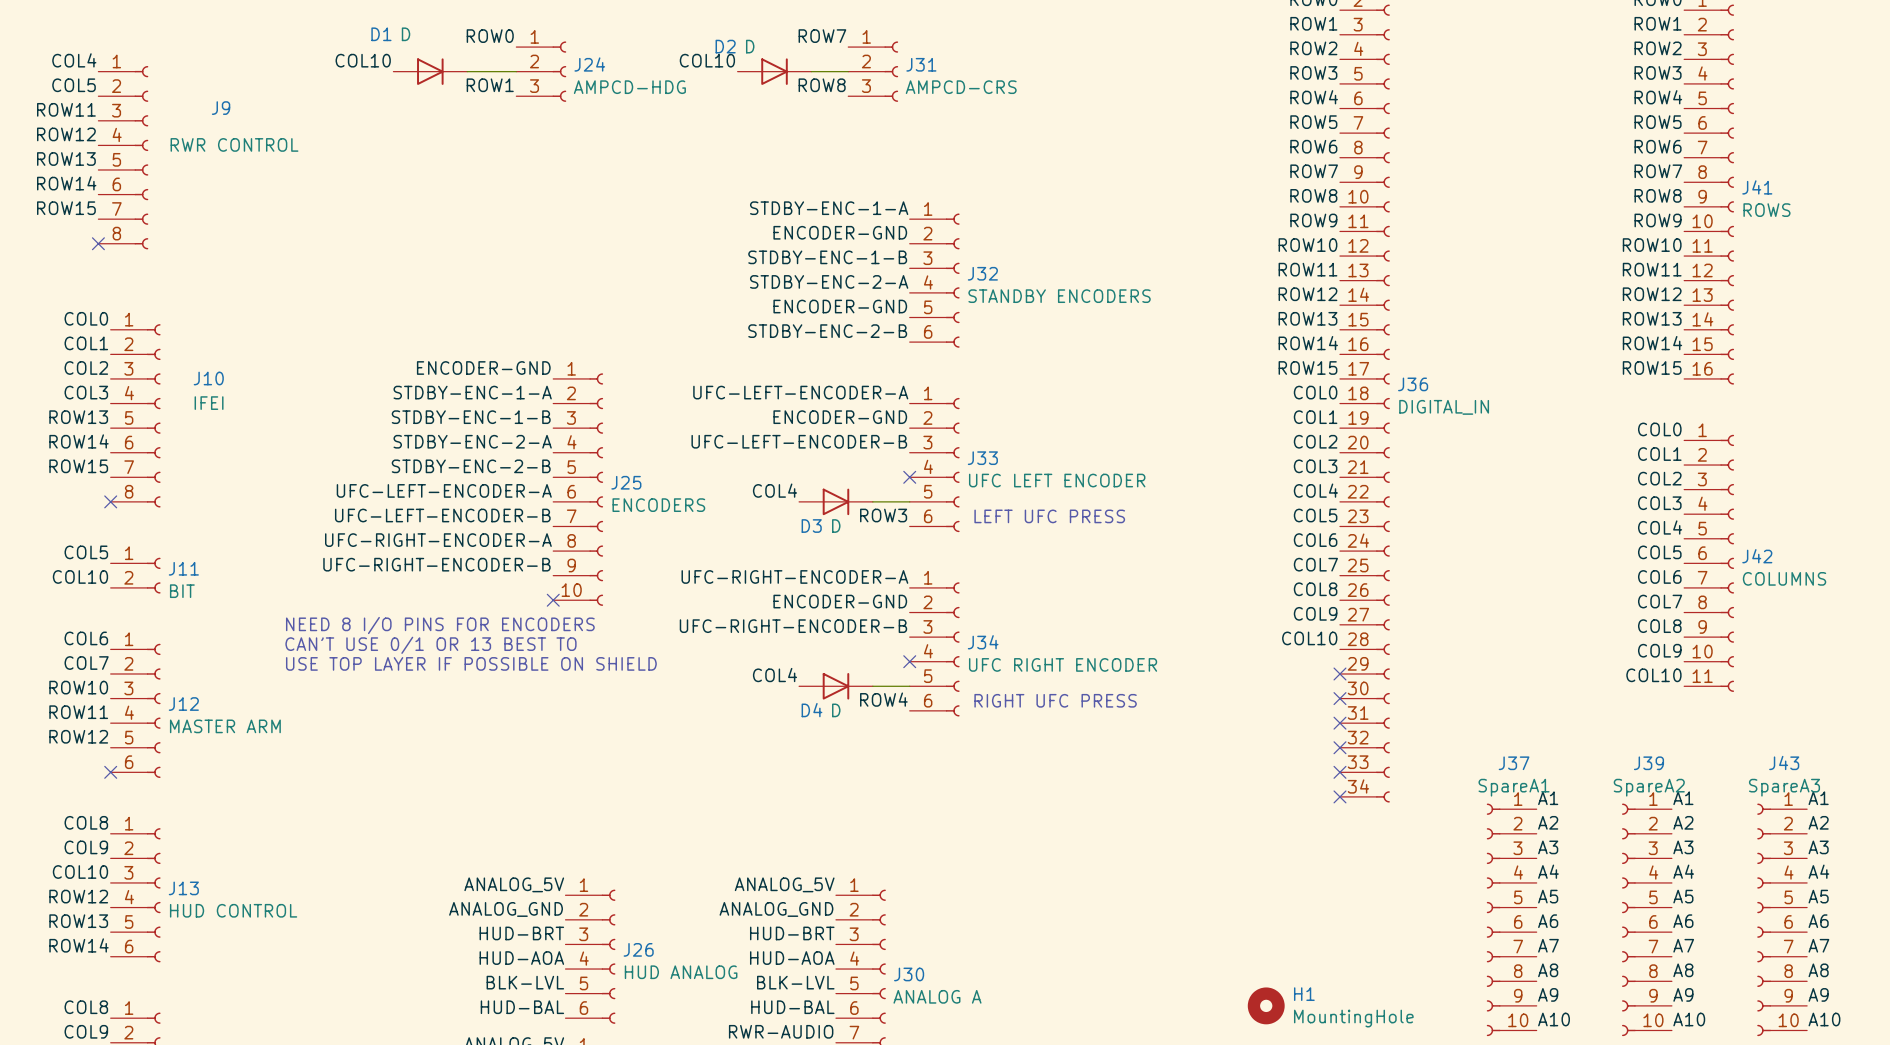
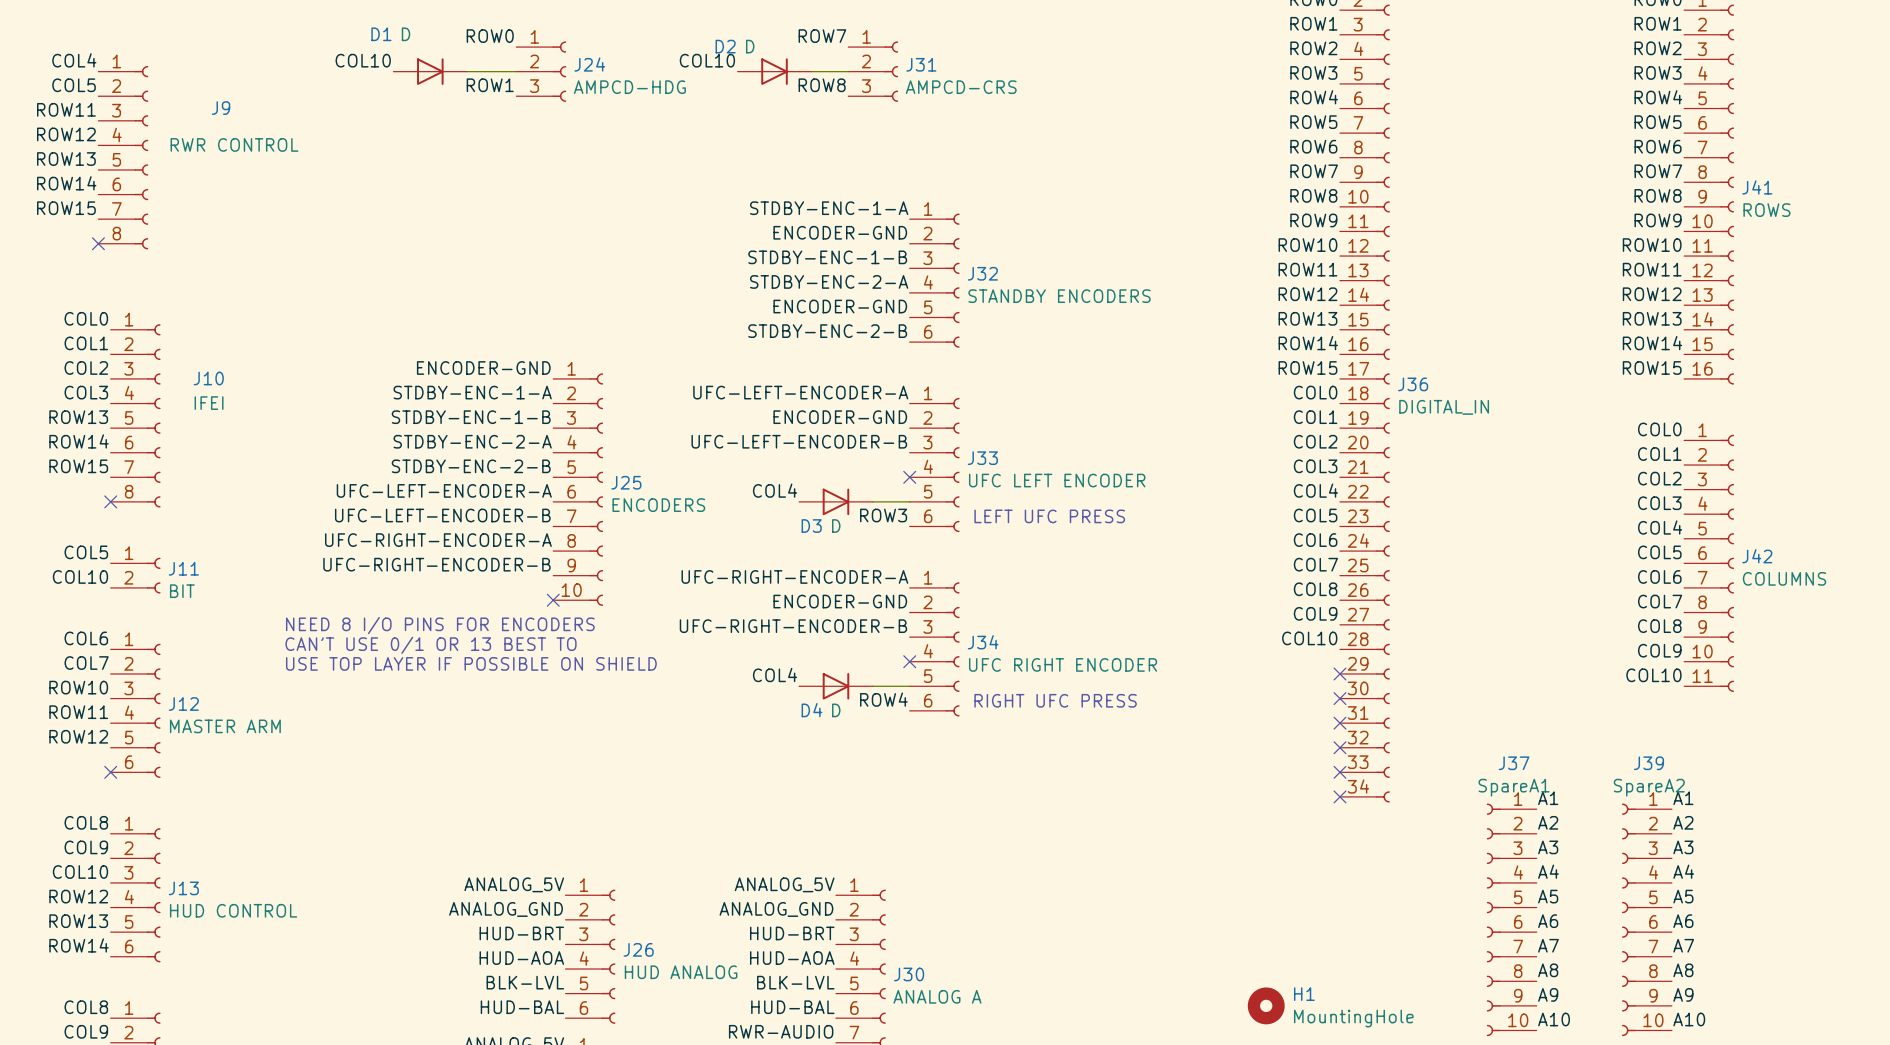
label: A1 (1818, 798) -> none
label: A2 (1818, 822) -> none
label: A3 (1818, 847) -> none
label: A4 (1818, 871) -> none
label: A5 (1818, 896) -> none
J43: SpareA3 (1782, 919) -> none
label: A6 (1818, 921) -> none
label: A7 (1818, 945) -> none
label: A8 (1818, 970) -> none
label: A9 (1818, 994) -> none
label: A10 (1824, 1019) -> none

